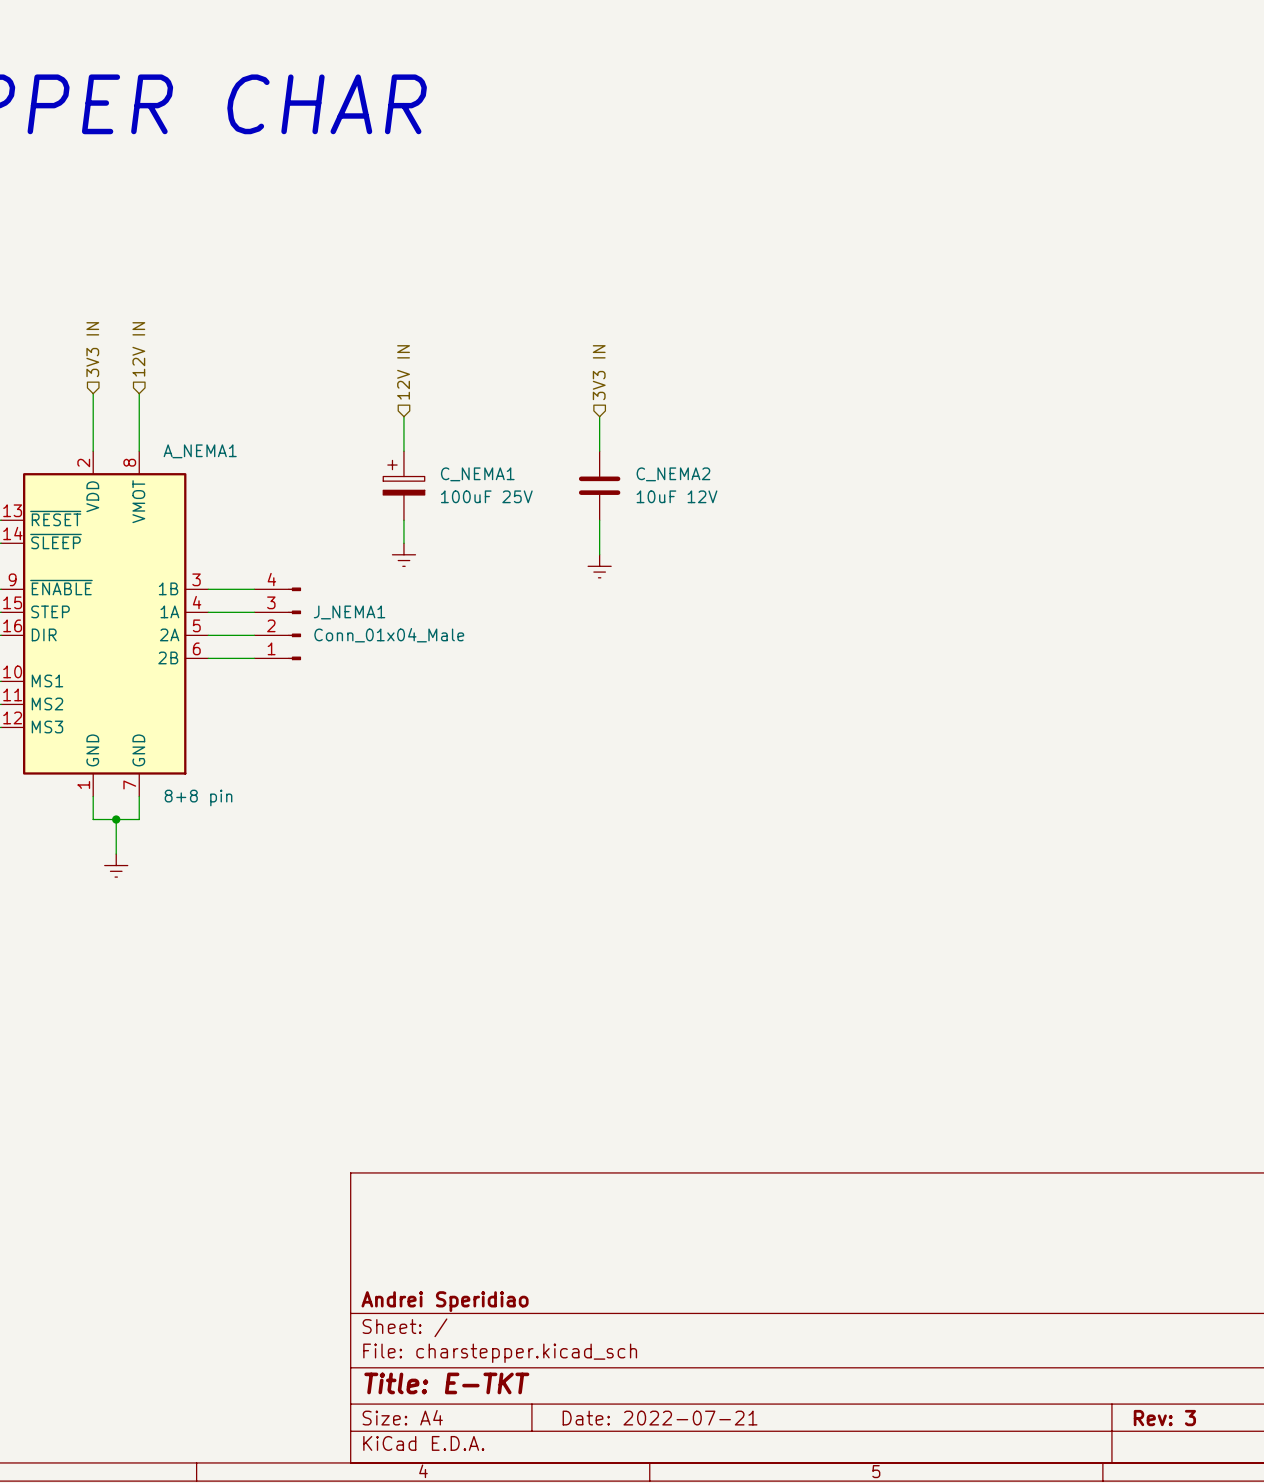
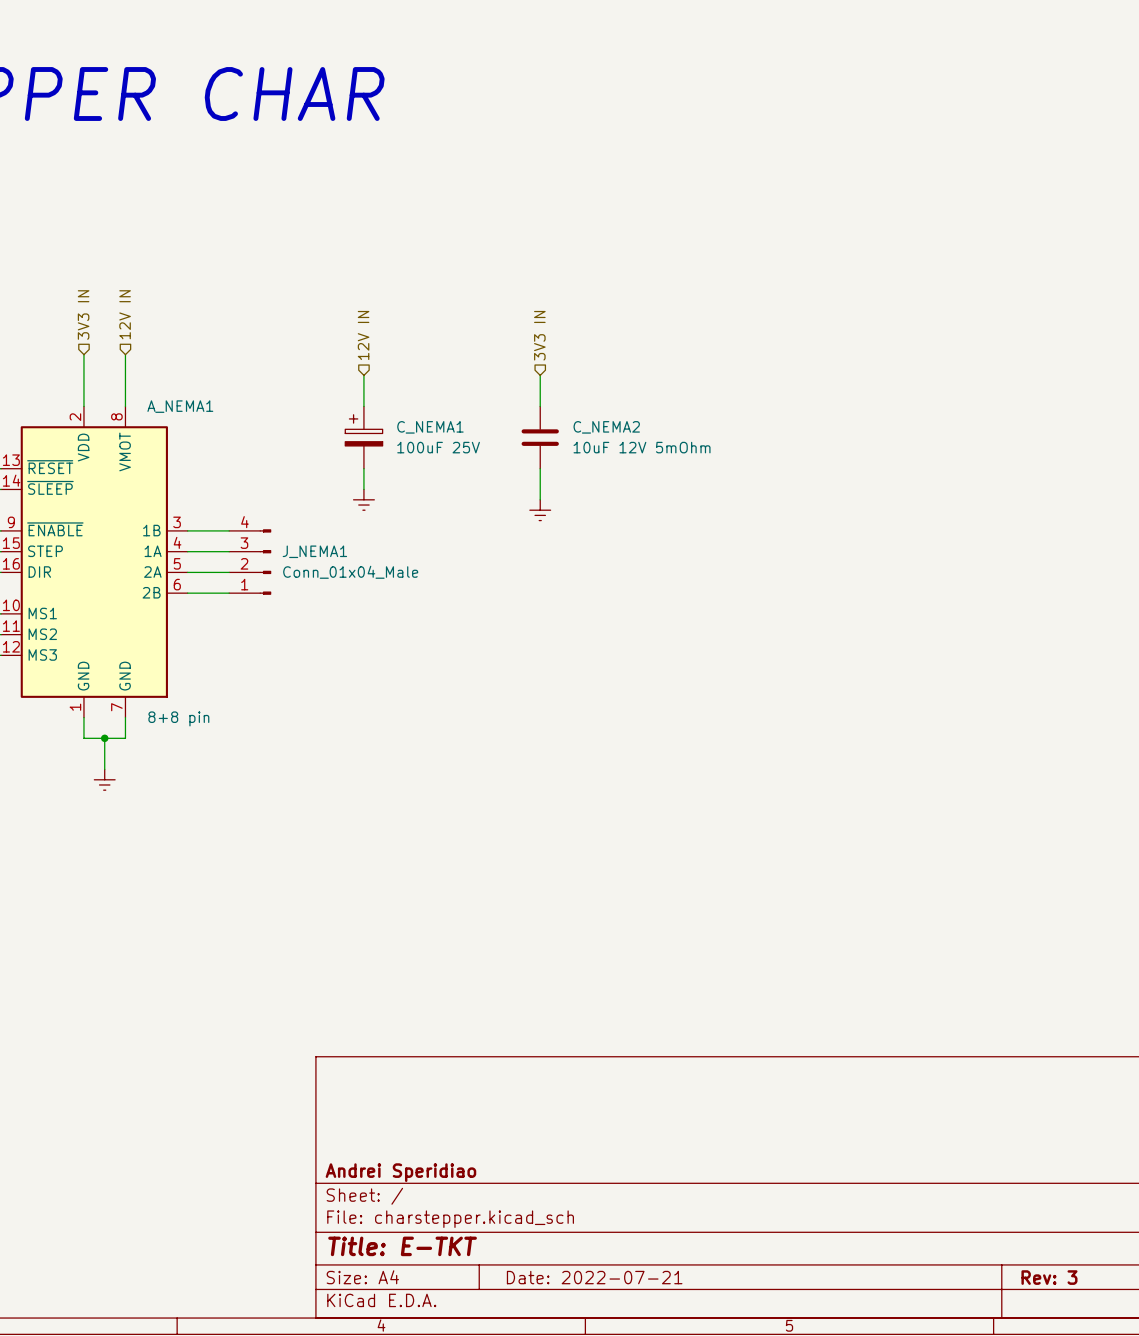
C_NEMA2 value: 10uF 12V (677, 496) -> 10uF 12V 5mOhm (642, 447)

